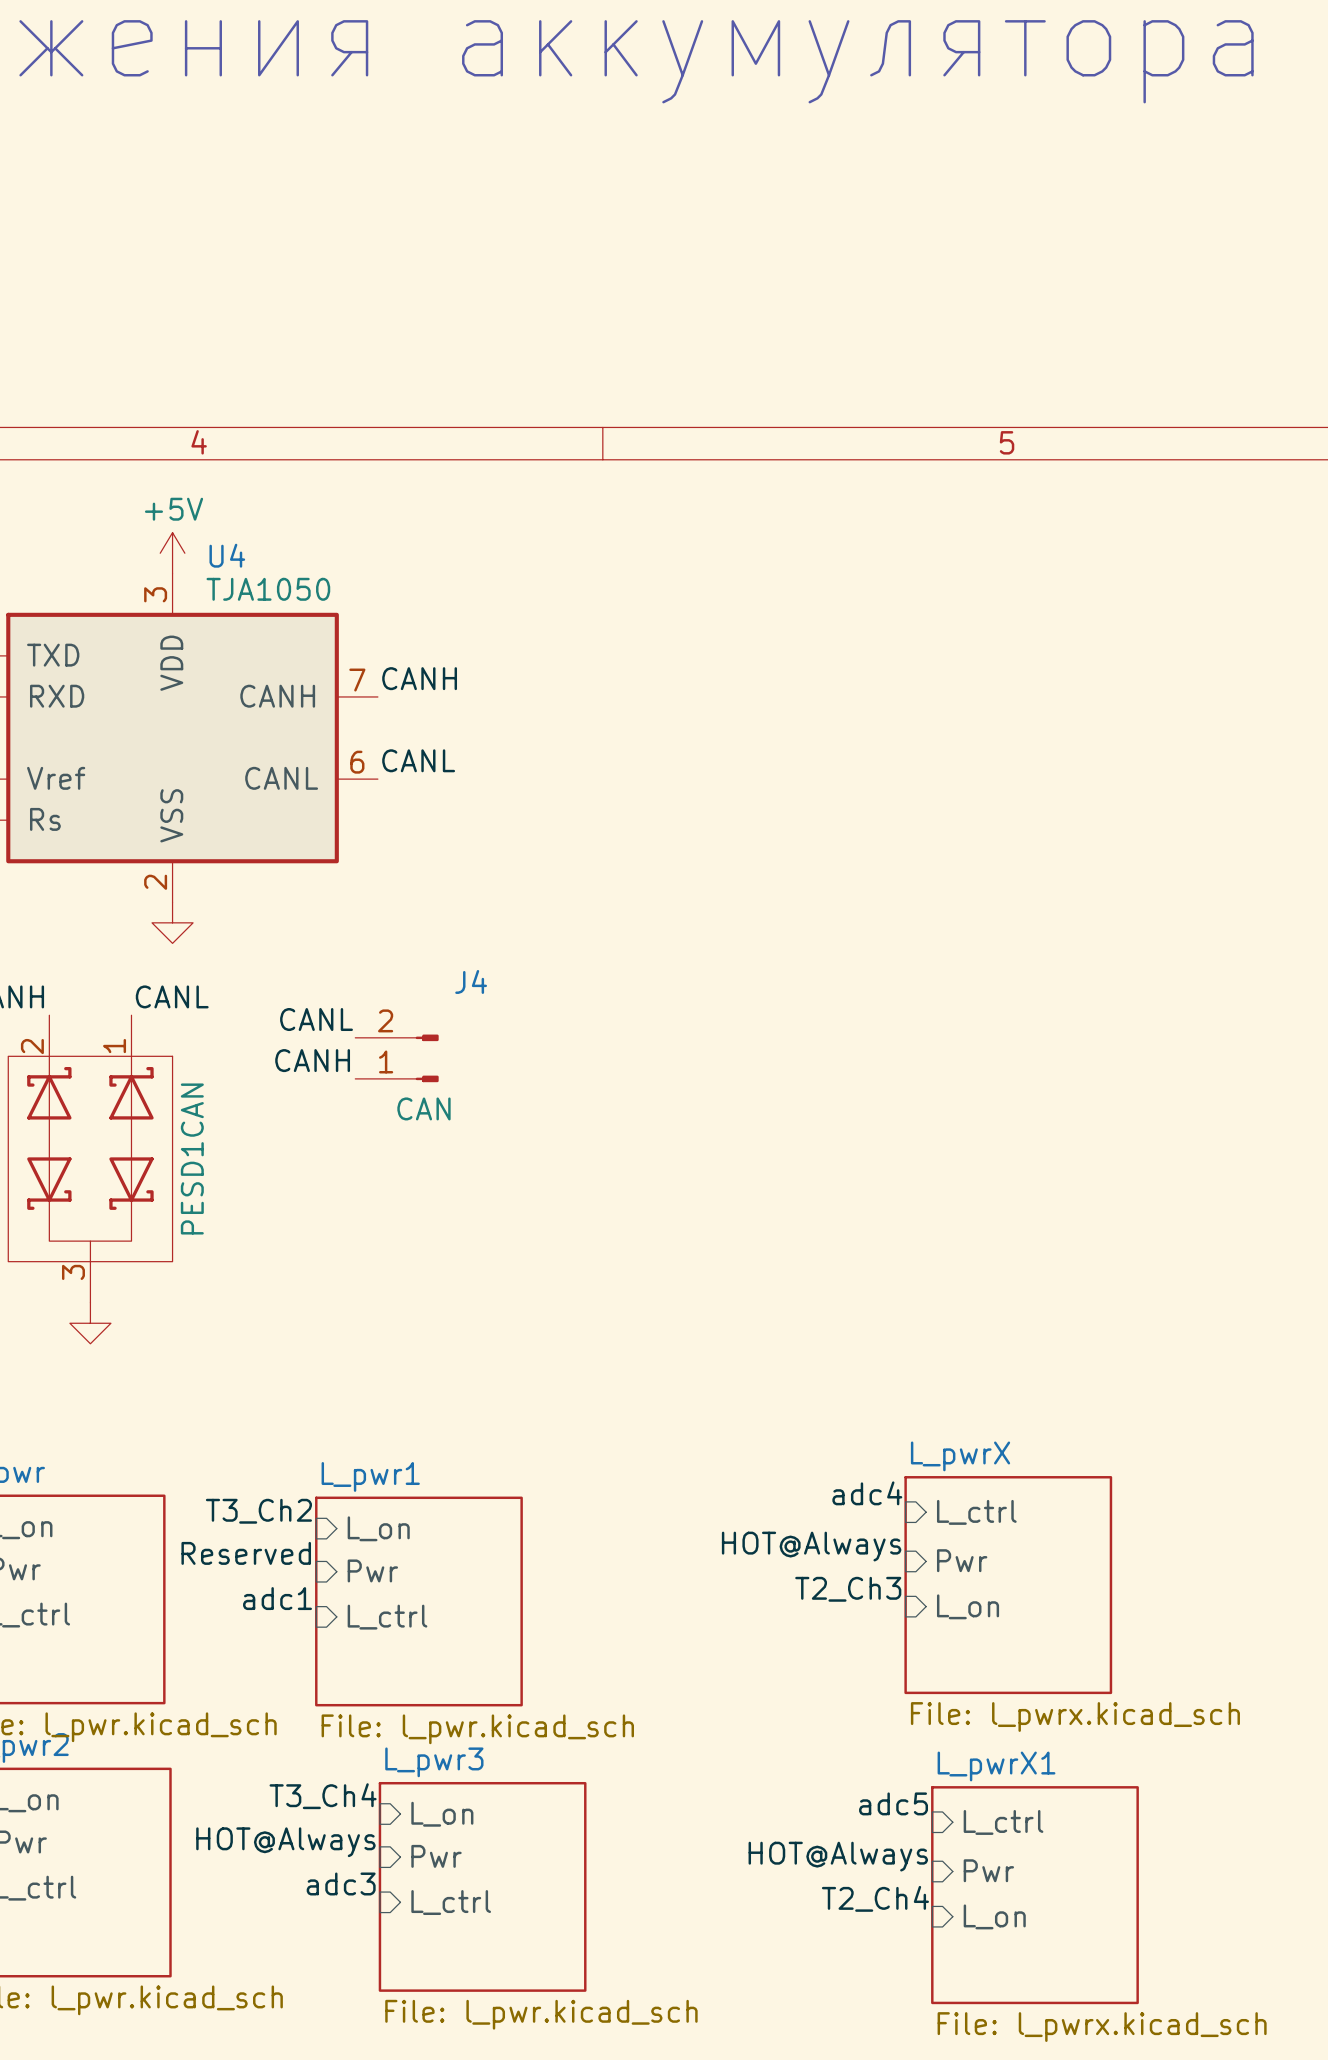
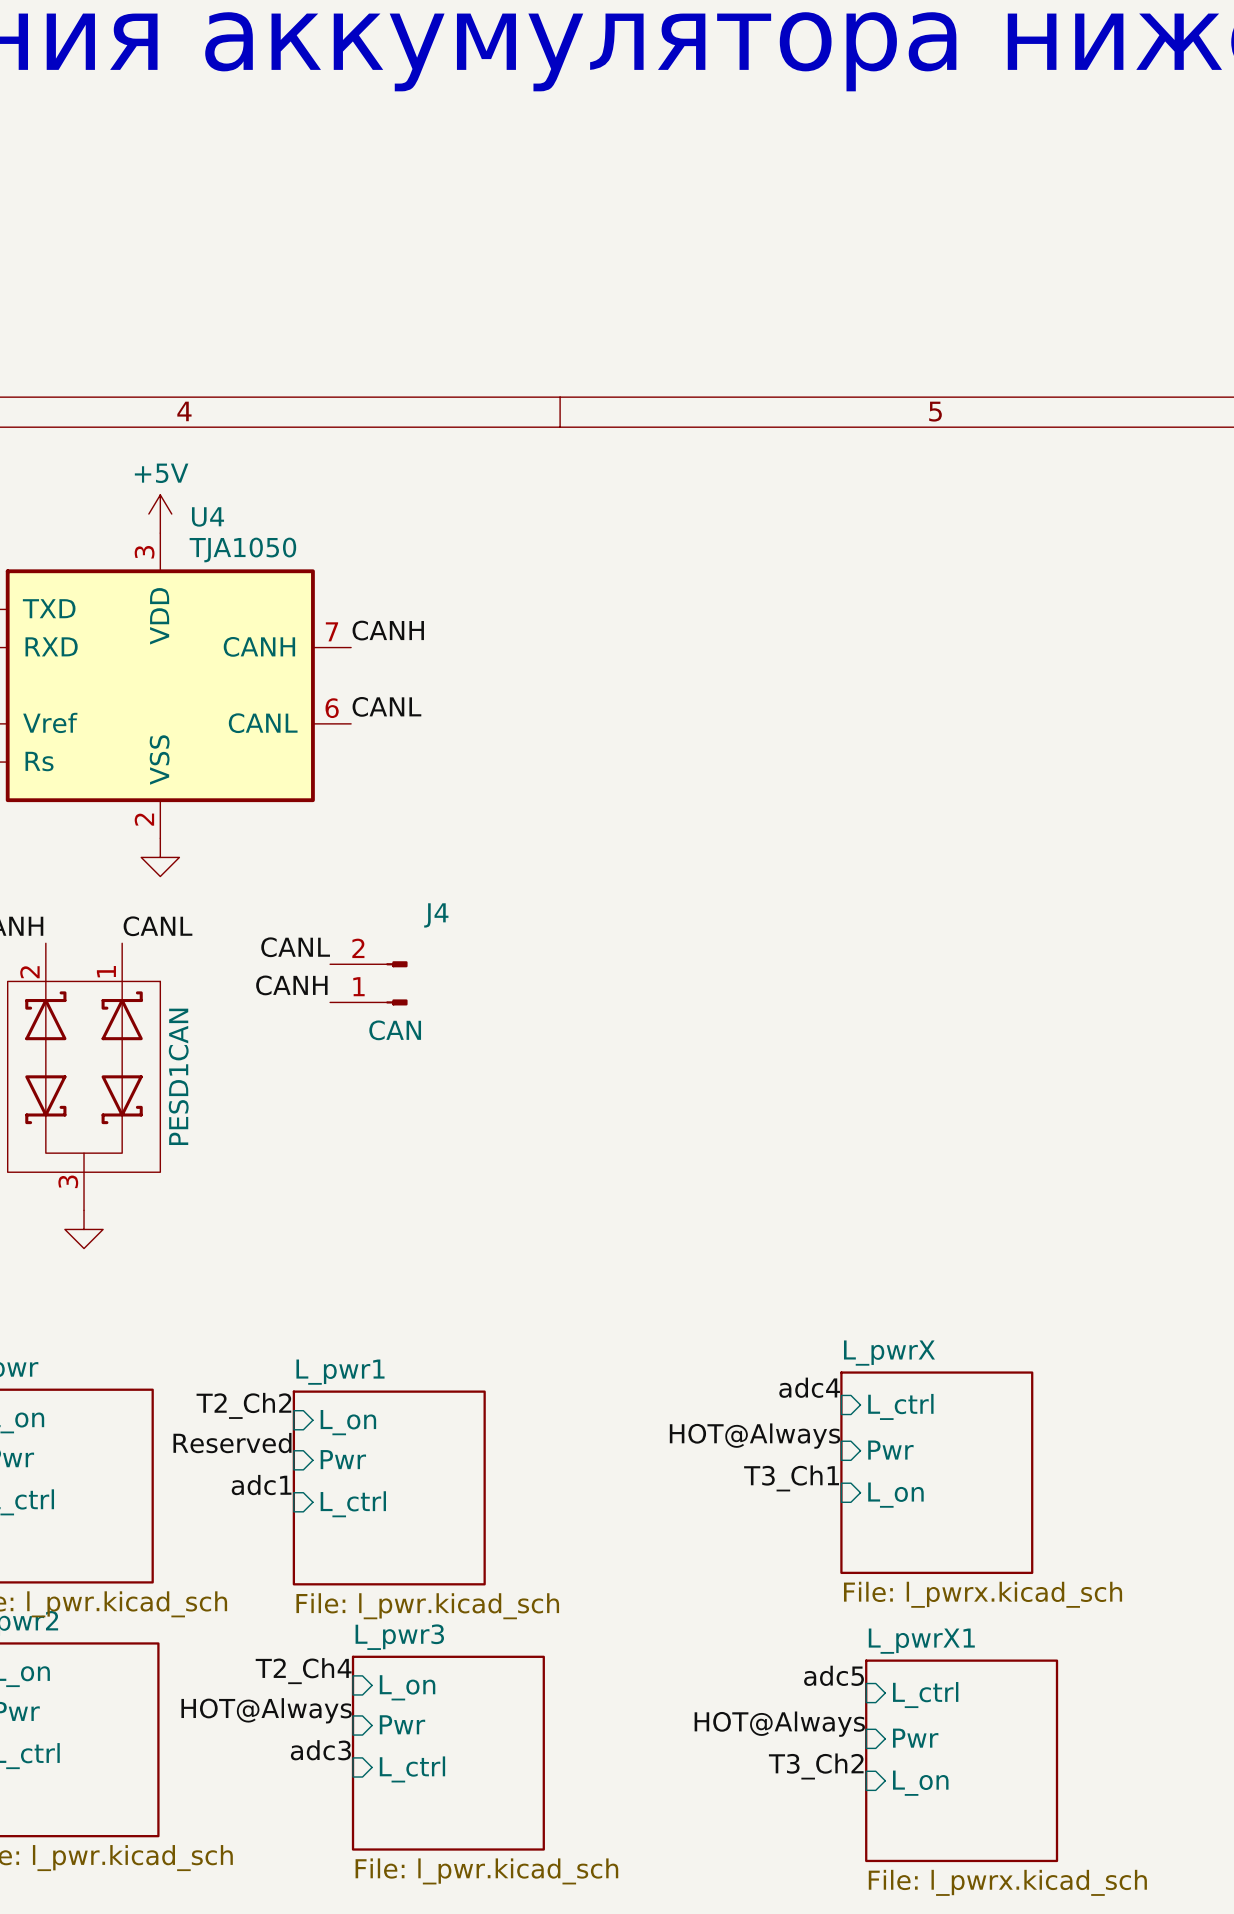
label: T3_Ch2 (258, 1511) -> T2_Ch2 (243, 1405)
label: T2_Ch3 (848, 1589) -> T3_Ch1 (791, 1478)
label: T3_Ch4 (323, 1796) -> T2_Ch4 (303, 1671)
label: T2_Ch4 (875, 1898) -> T3_Ch2 (816, 1766)

